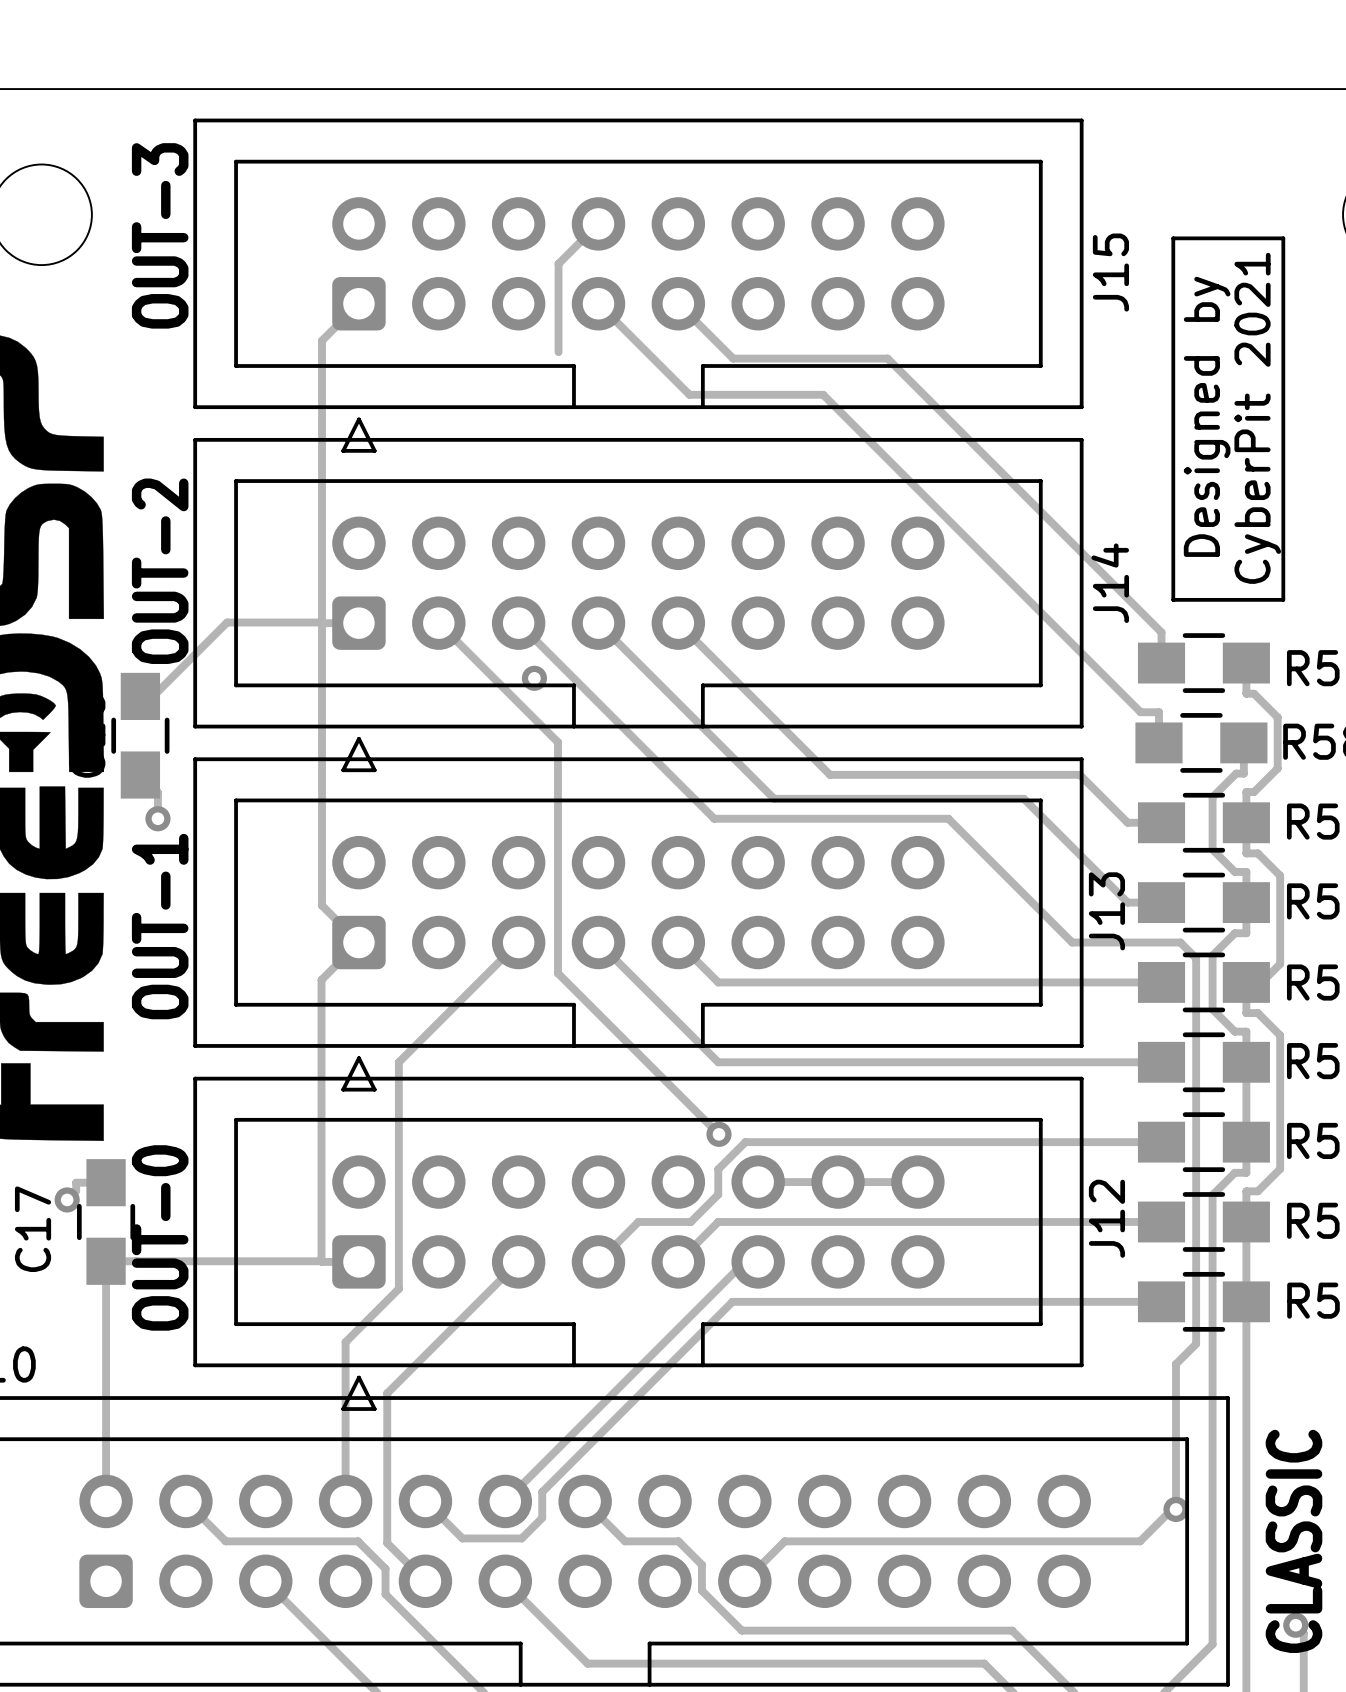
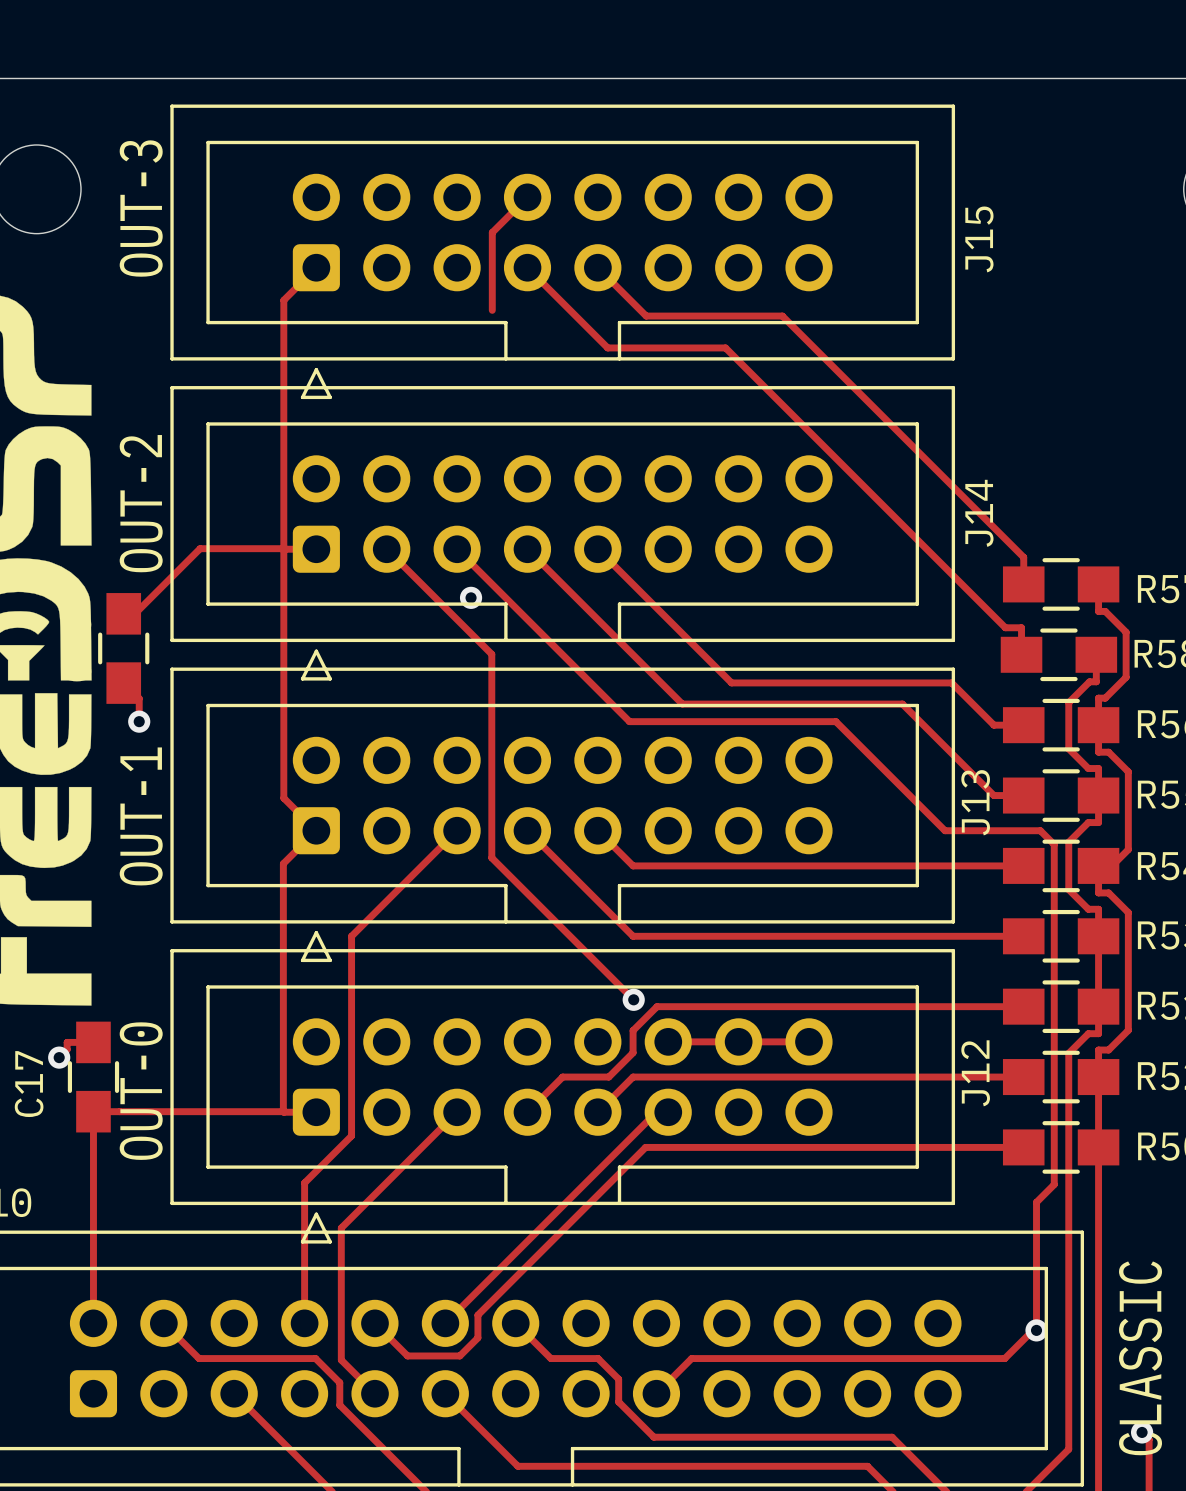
line: (1173, 238) (1283, 238) (1283, 599) (1173, 599) (1173, 238) -> none
text: Designed by (1207, 416) -> none
text: CyberPit 2021 (1257, 418) -> none

